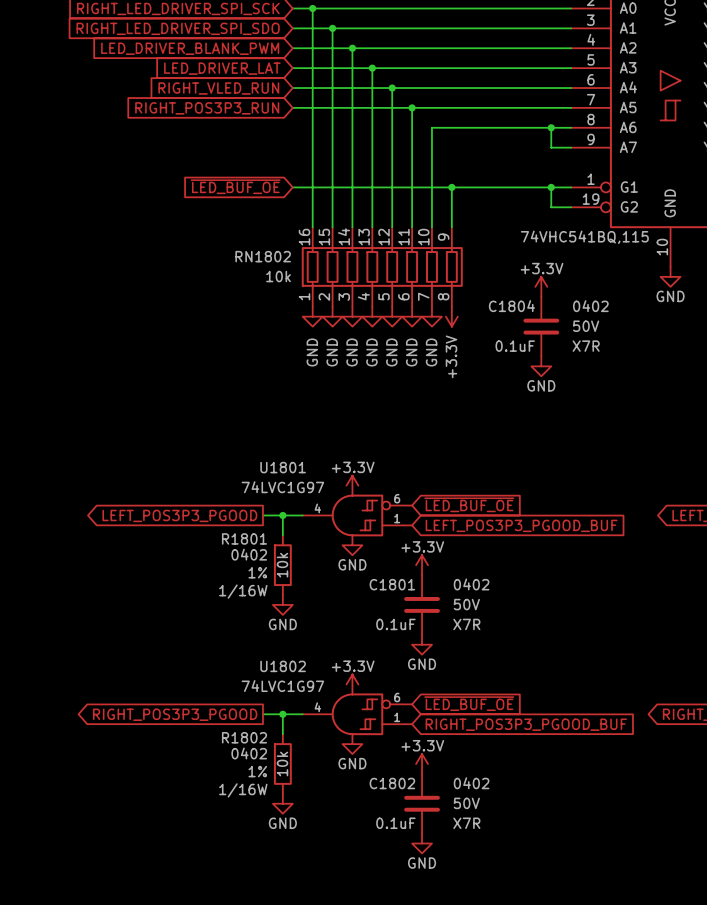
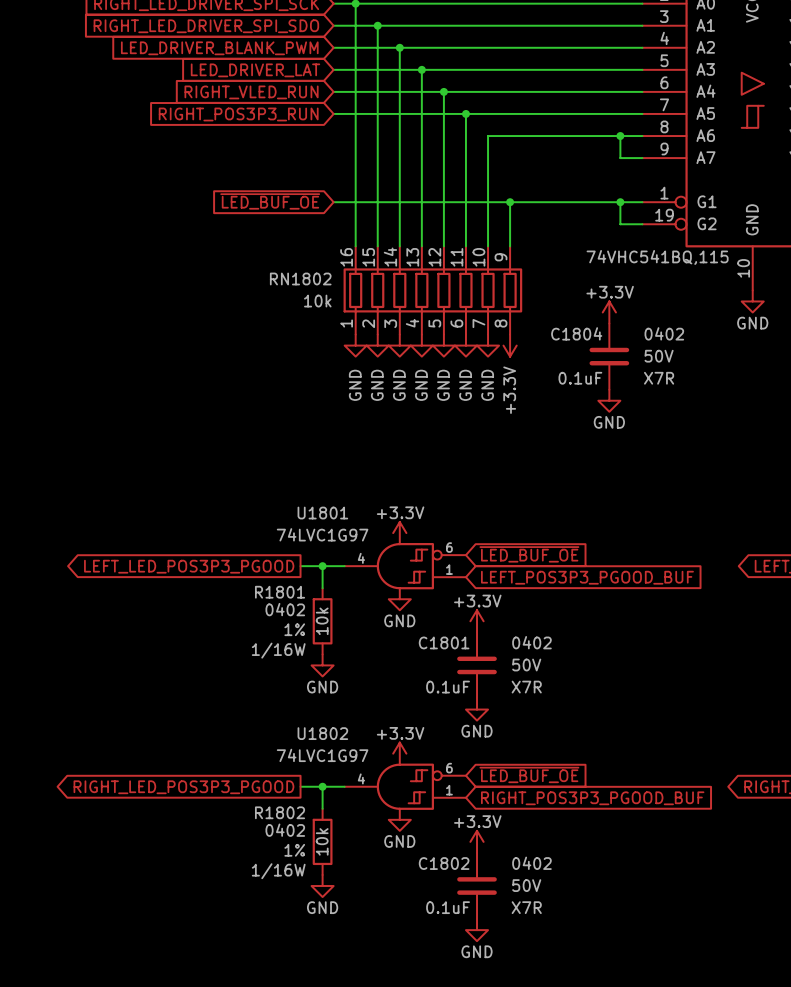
global label: LEFT_POS3P3_PGOOD (179, 515) -> LEFT_LED_POS3P3_PGOOD (189, 566)
global label: RIGHT_POS3P3_PGOOD (175, 714) -> RIGHT_LED_POS3P3_PGOOD (183, 787)

